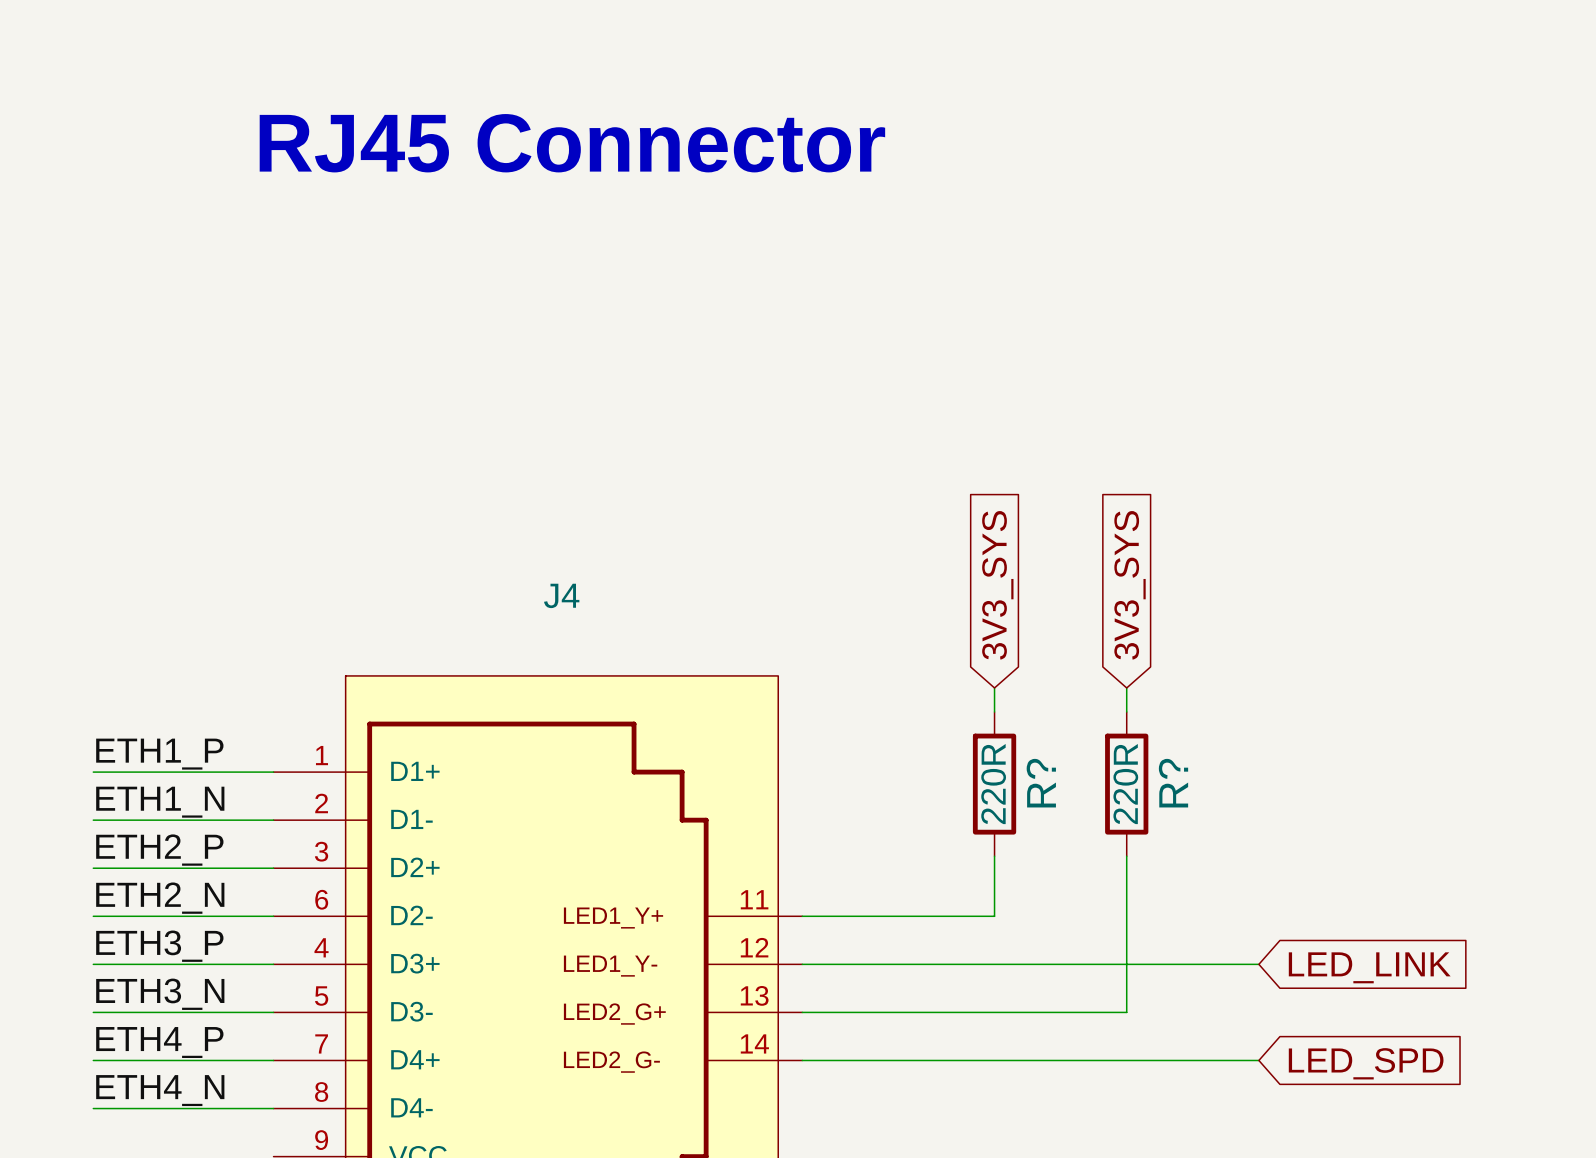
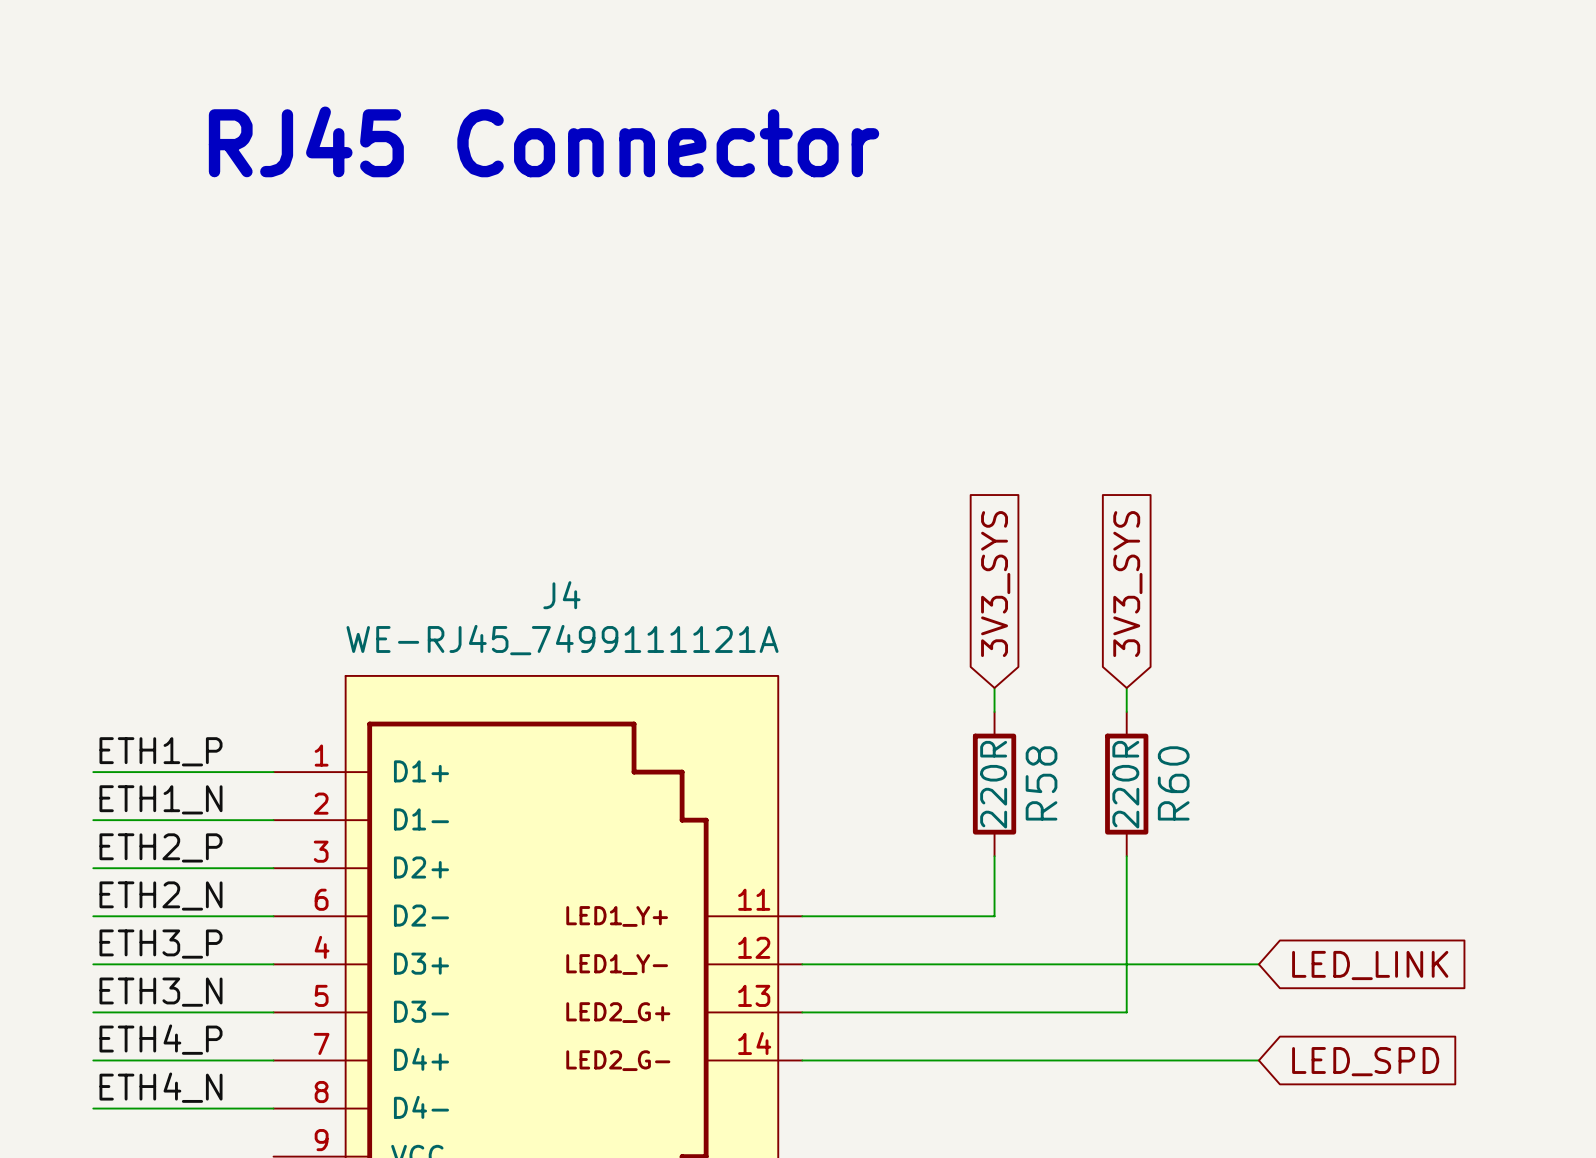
J4 value: none -> WE-RJ45_7499111121A (562, 640)
R? name: R? (1041, 783) -> R58 (1041, 783)
R? name: R? (1173, 783) -> R60 (1173, 783)

